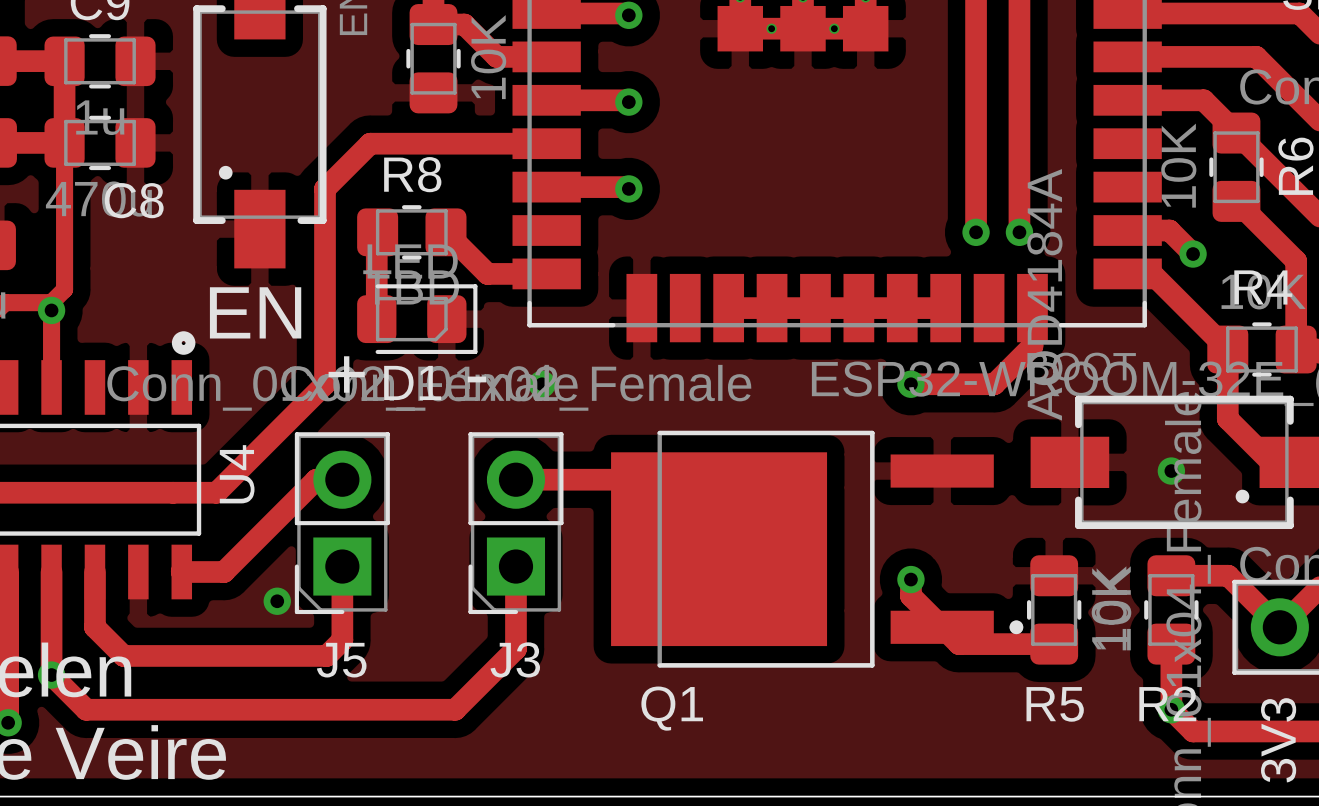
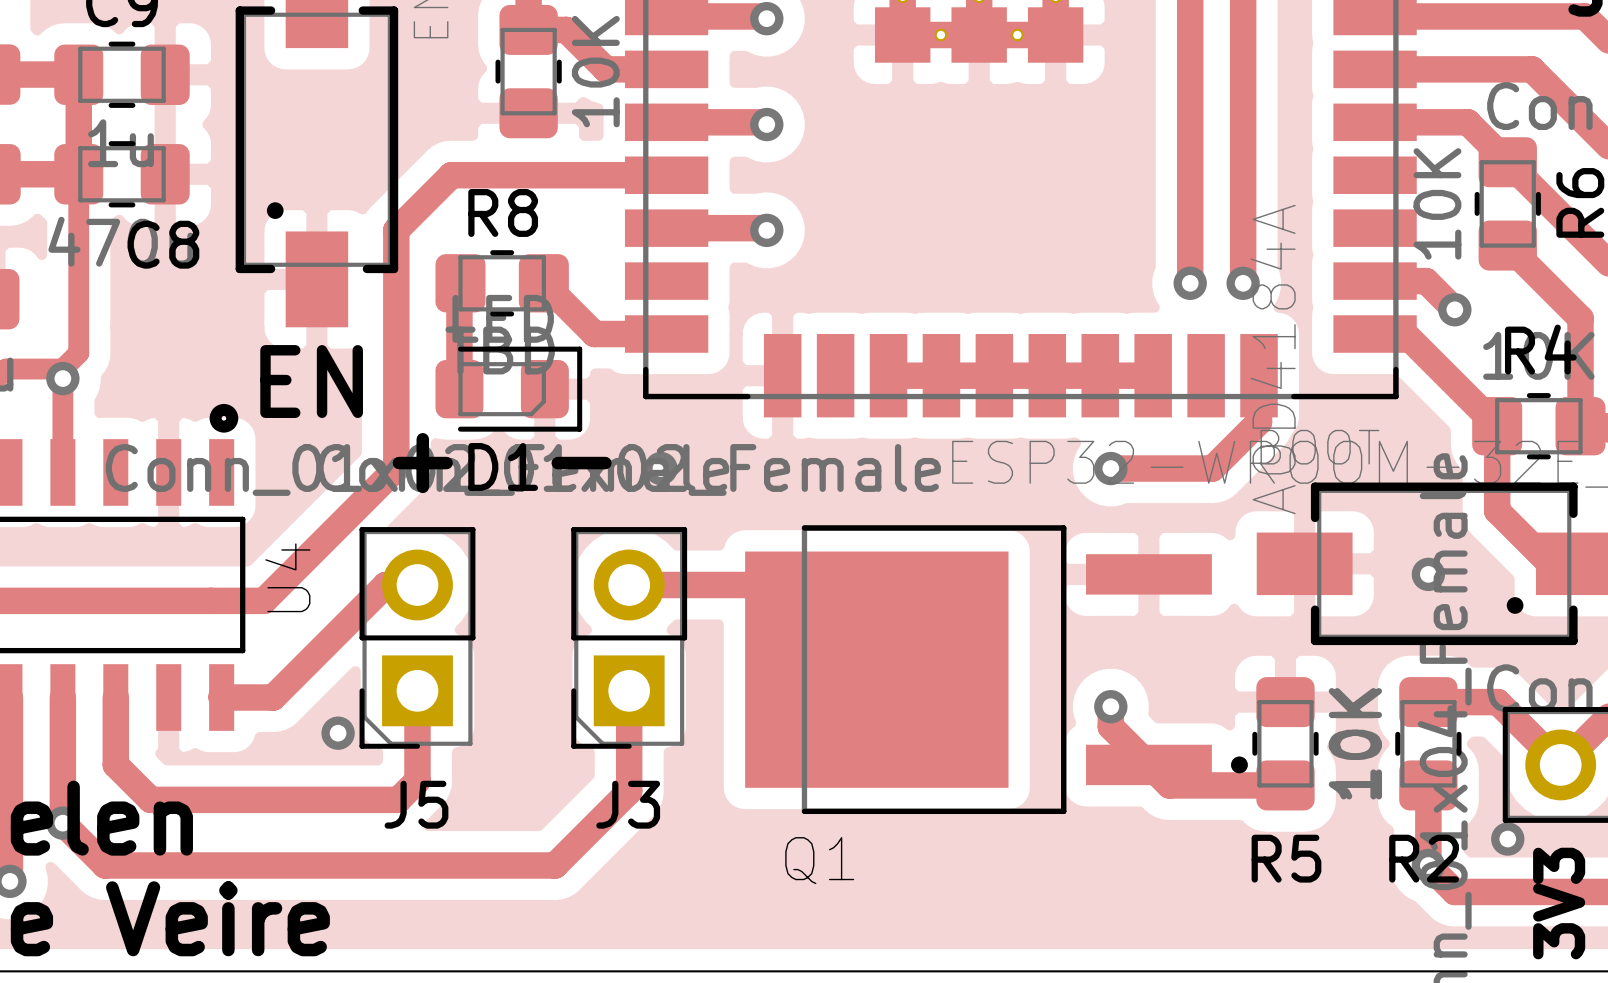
via: none -> (1507, 839)

